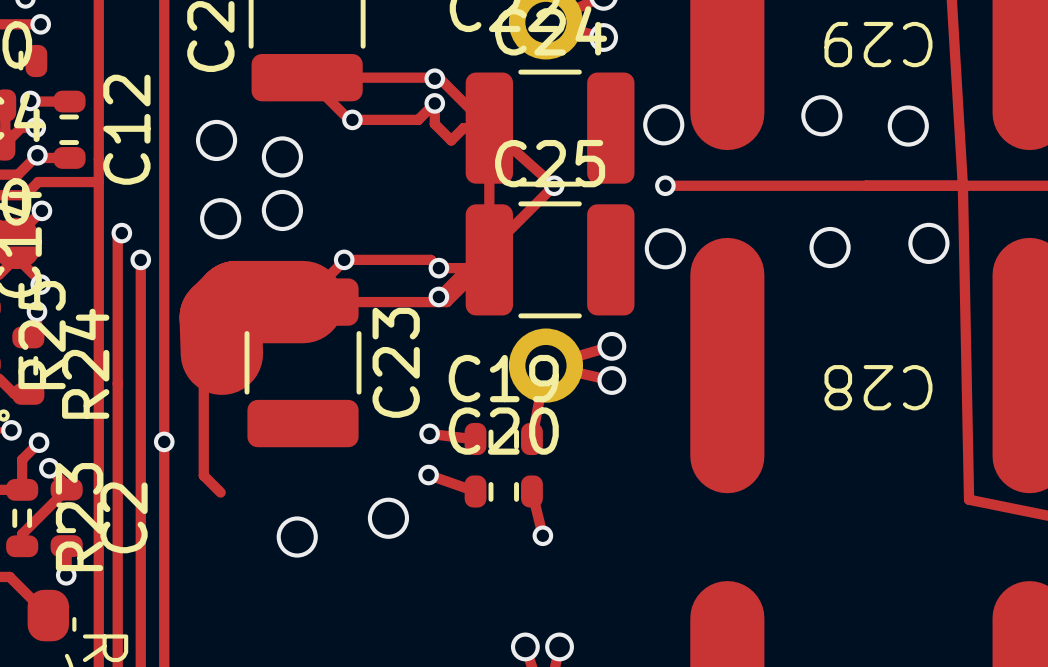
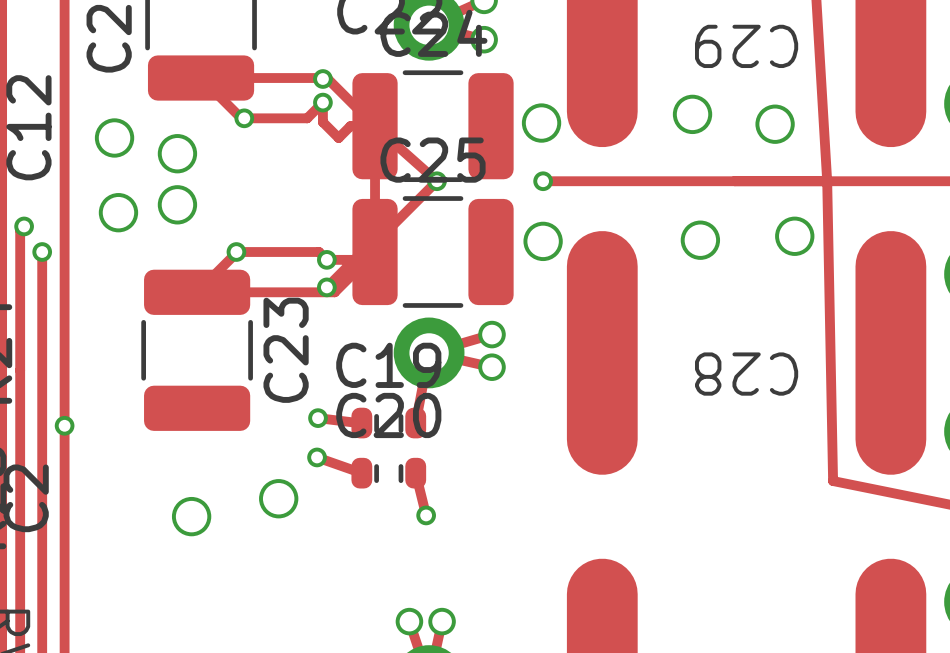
track: (303, 302) (236, 302) (220, 317) (221, 365) (203, 383) (203, 475) (220, 492) -> none

